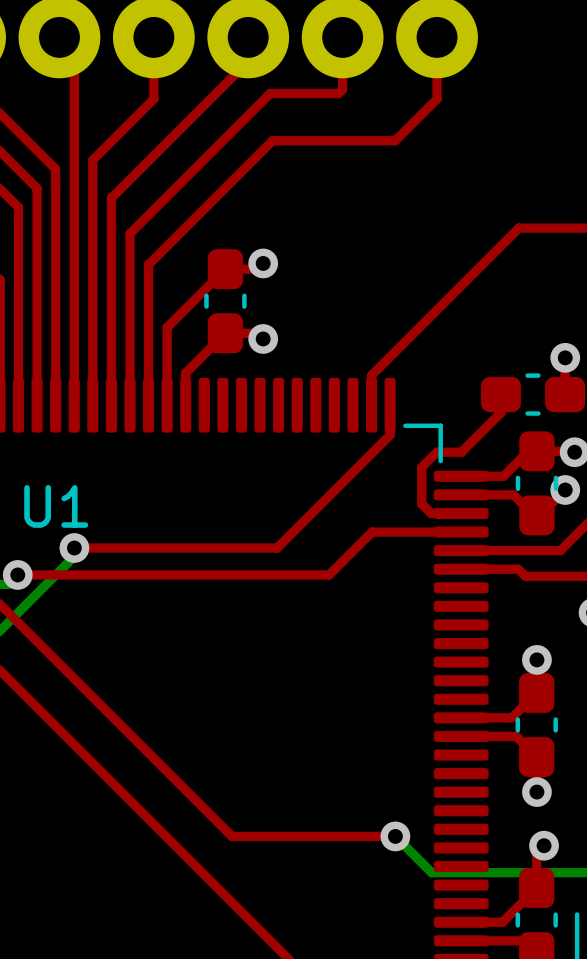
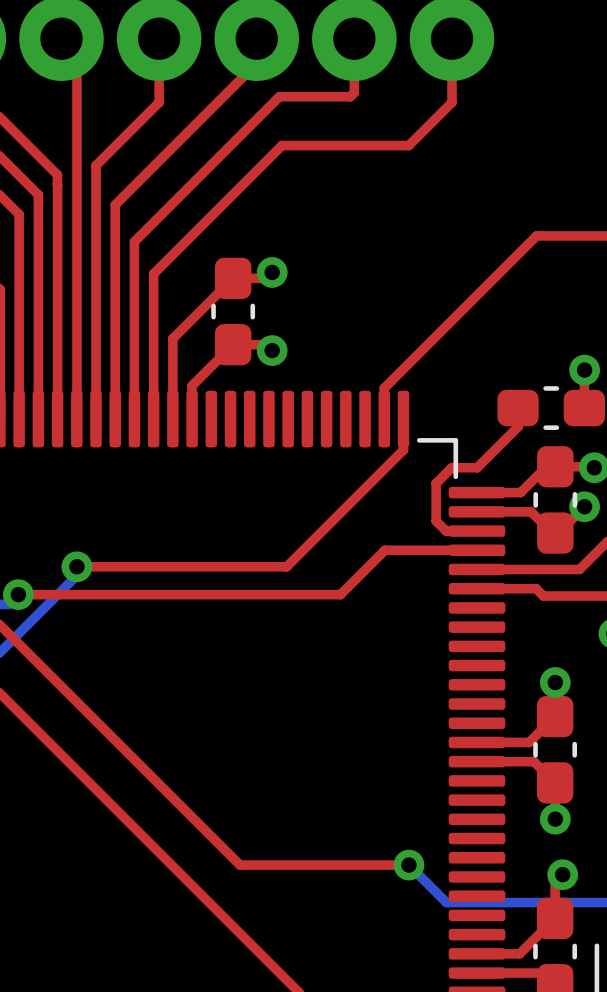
U1 name: U1 (56, 506) -> none

